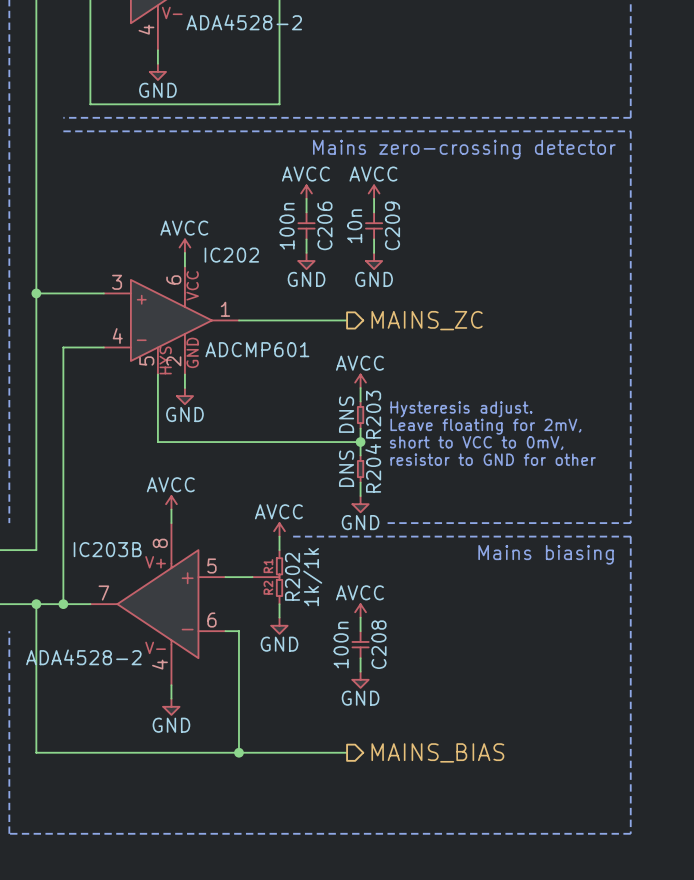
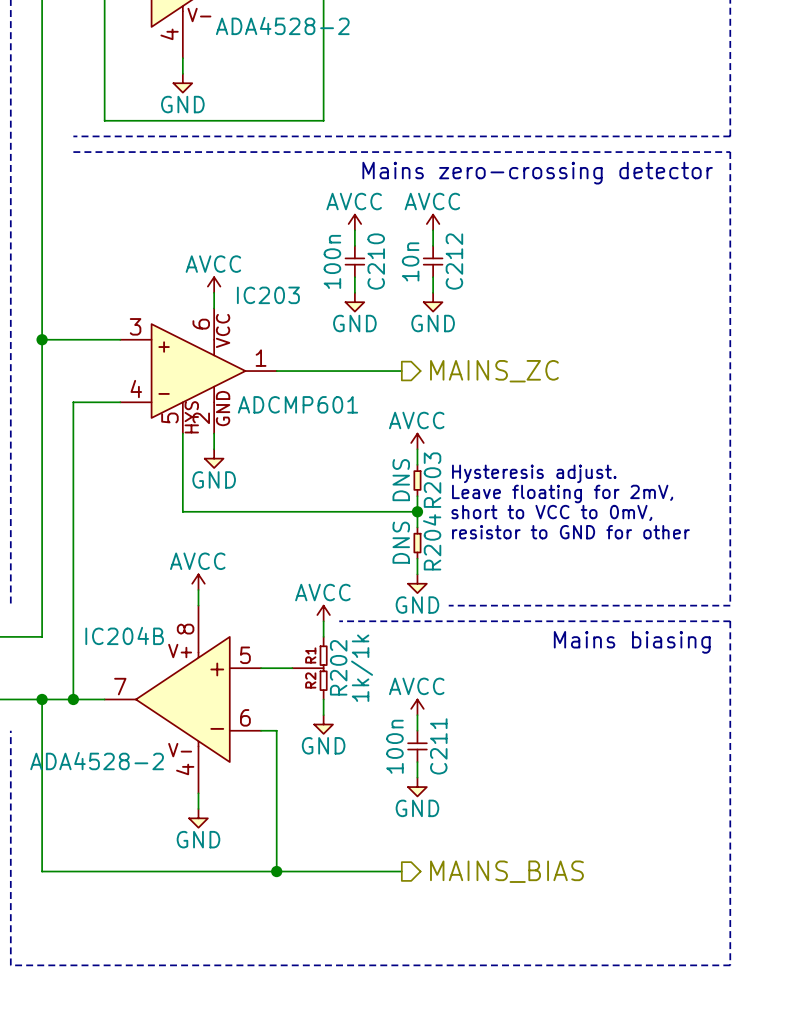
C206 name: C206 (324, 225) -> C210 (376, 261)
C209 name: C209 (392, 225) -> C212 (454, 261)
IC202 name: IC202 (231, 255) -> IC203 (268, 295)
IC203B name: IC203B (107, 549) -> IC204B (124, 635)
C208 name: C208 (378, 644) -> C211 (438, 746)

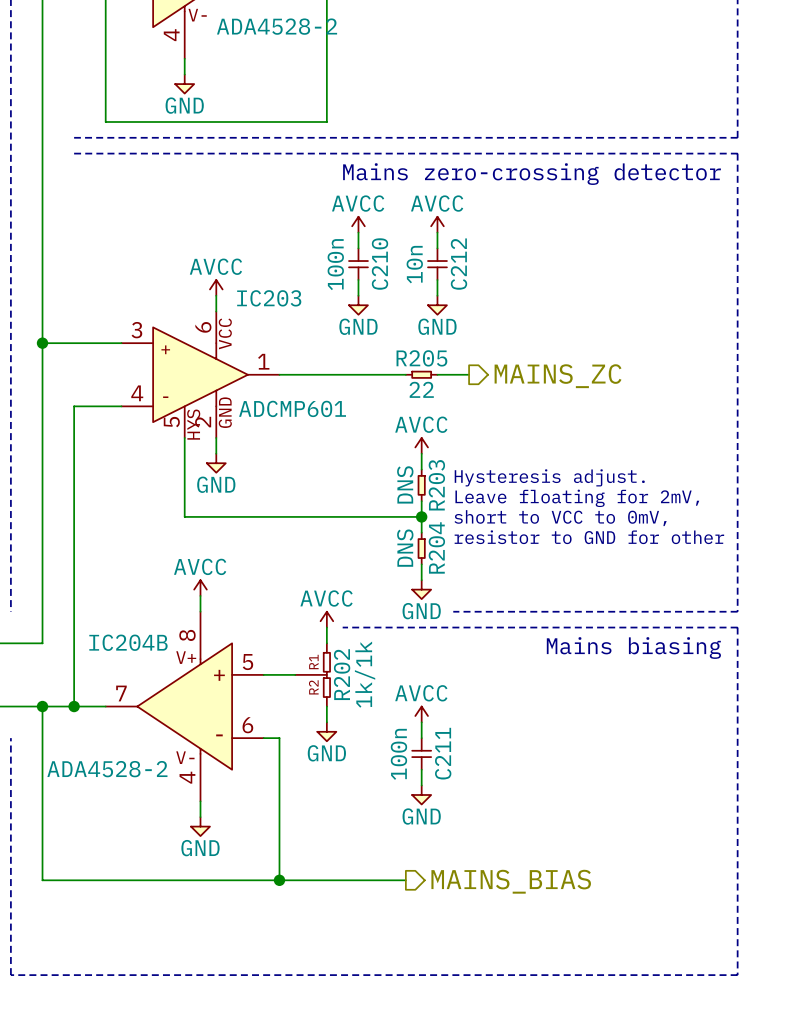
R205: none -> 22 (421, 374)
wire: none -> (437, 374) (469, 374)
hierarchical label position: MAINS_ZC (494, 371) -> MAINS_ZC (558, 376)

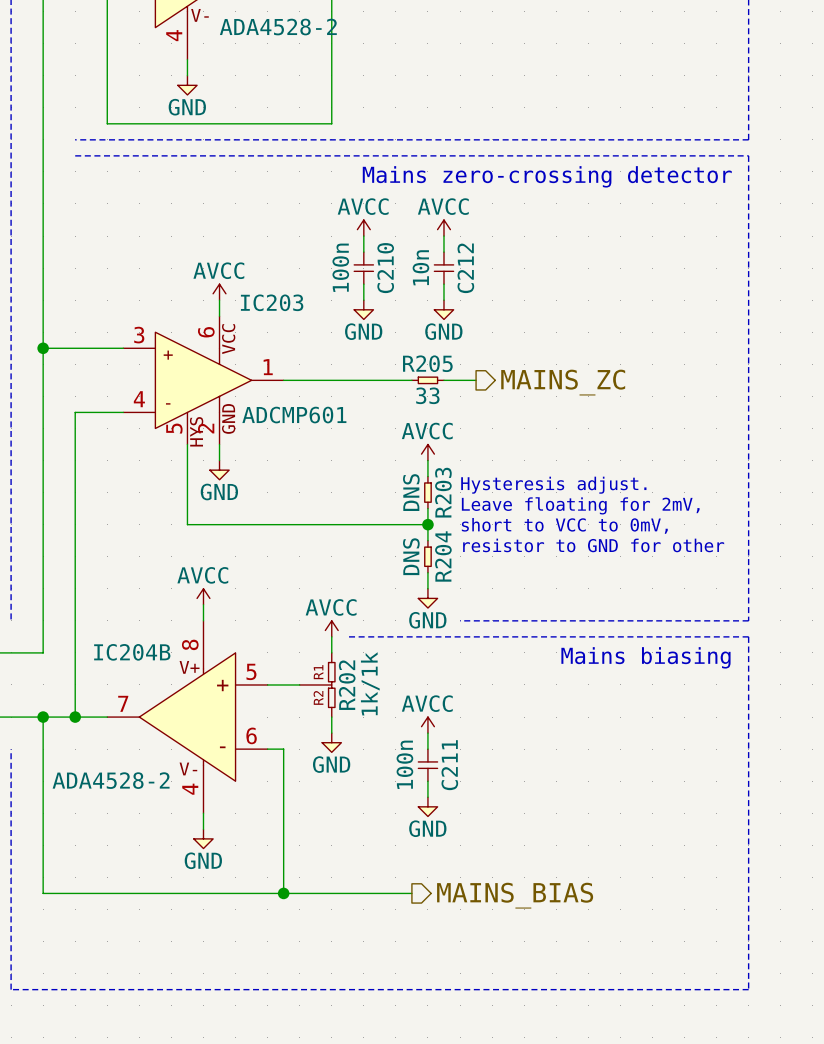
R205 value: 22 (421, 389) -> 33 (427, 395)

